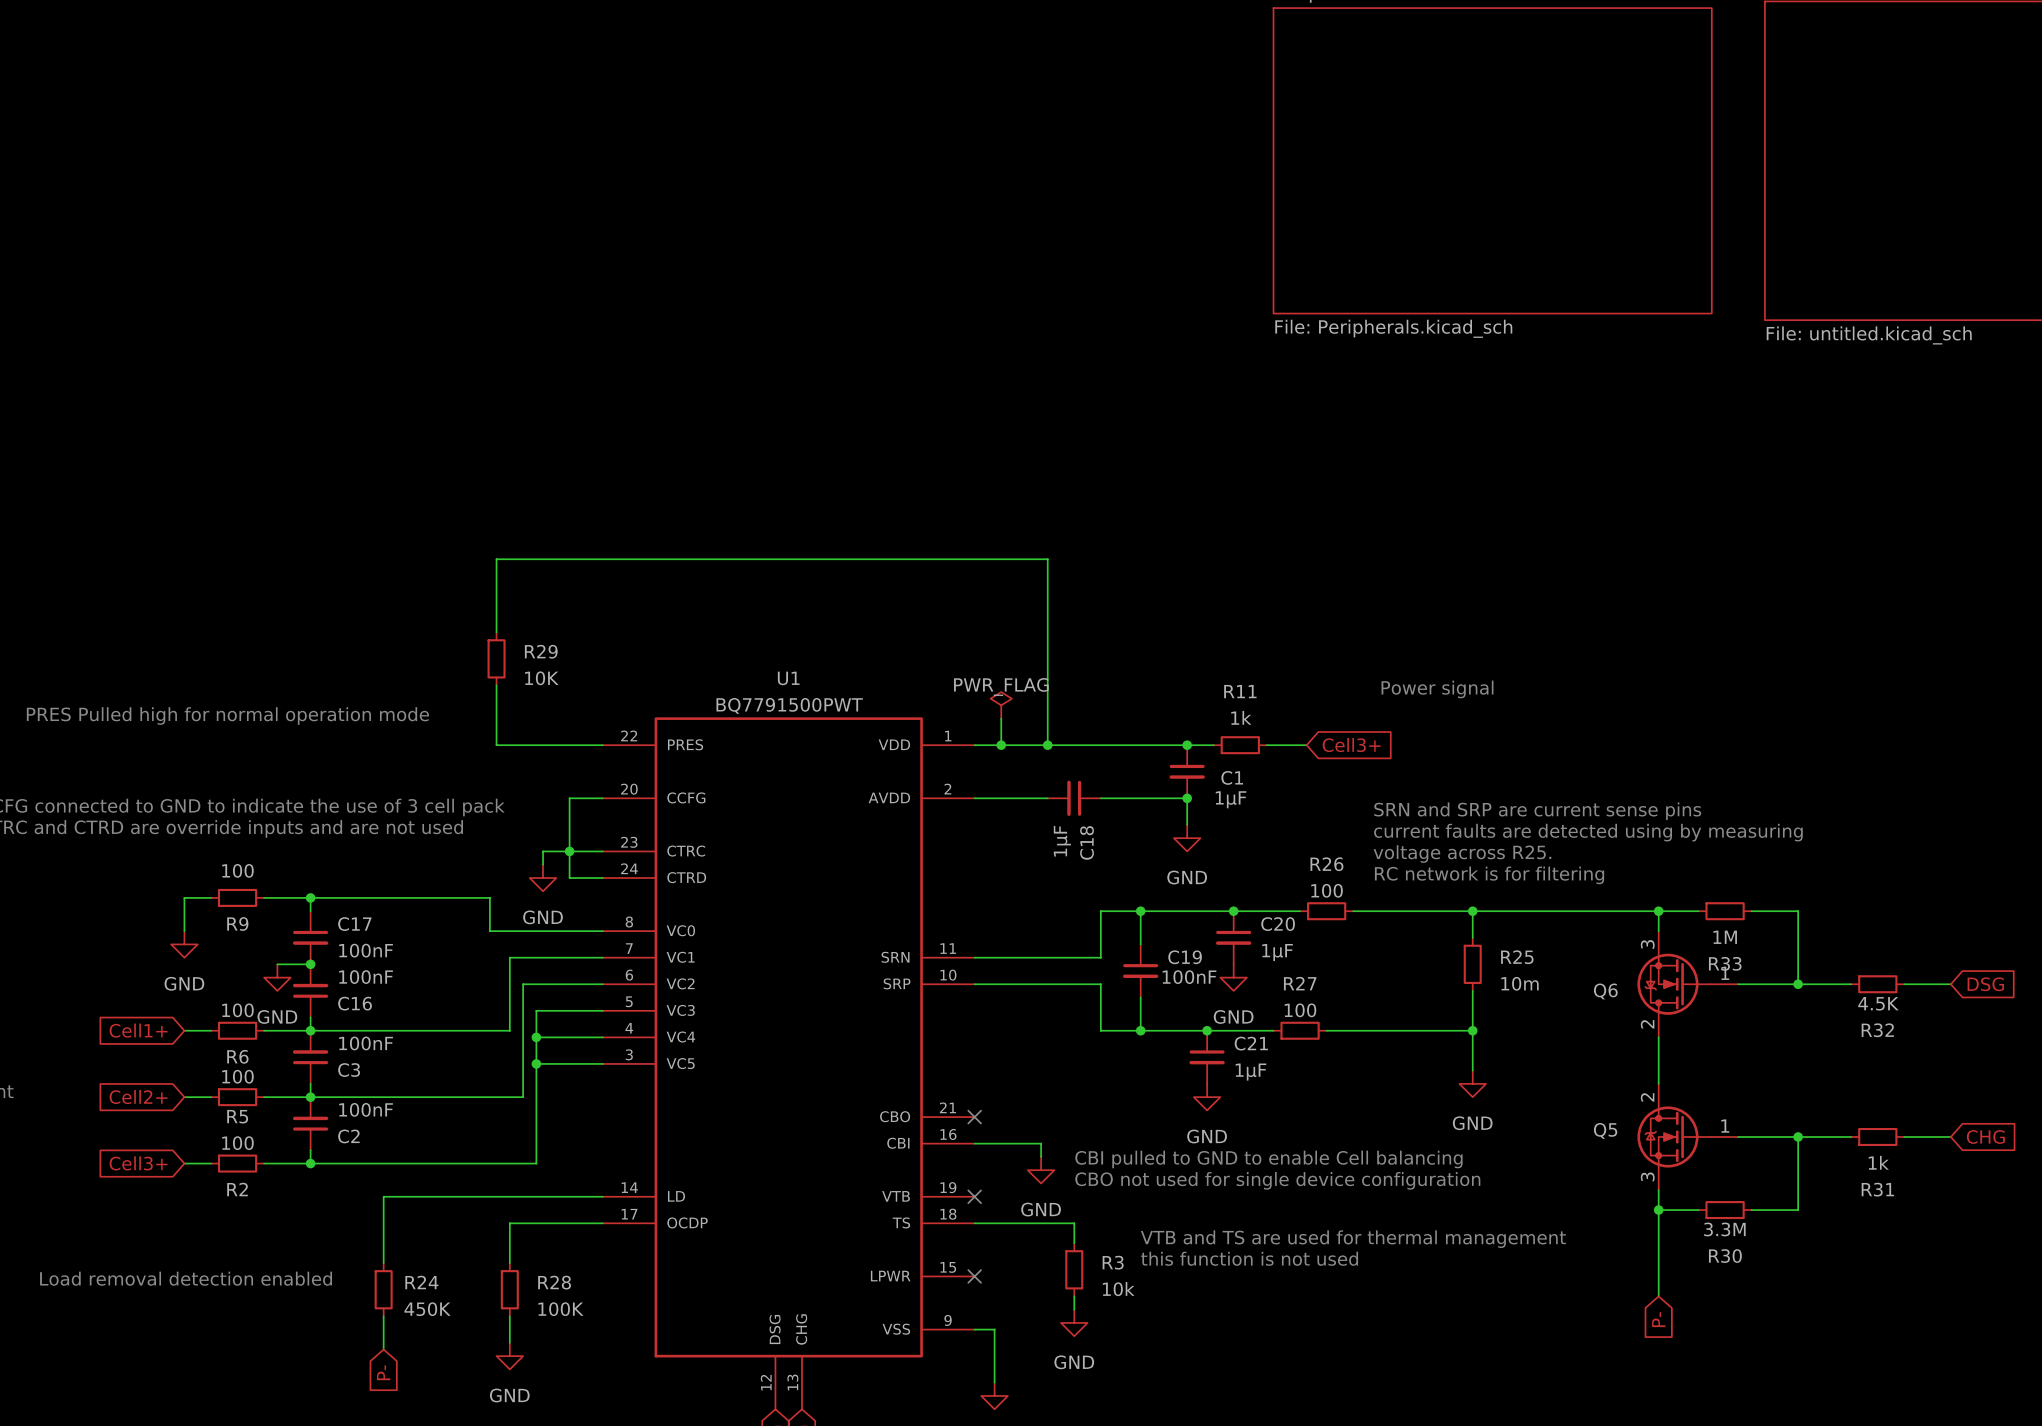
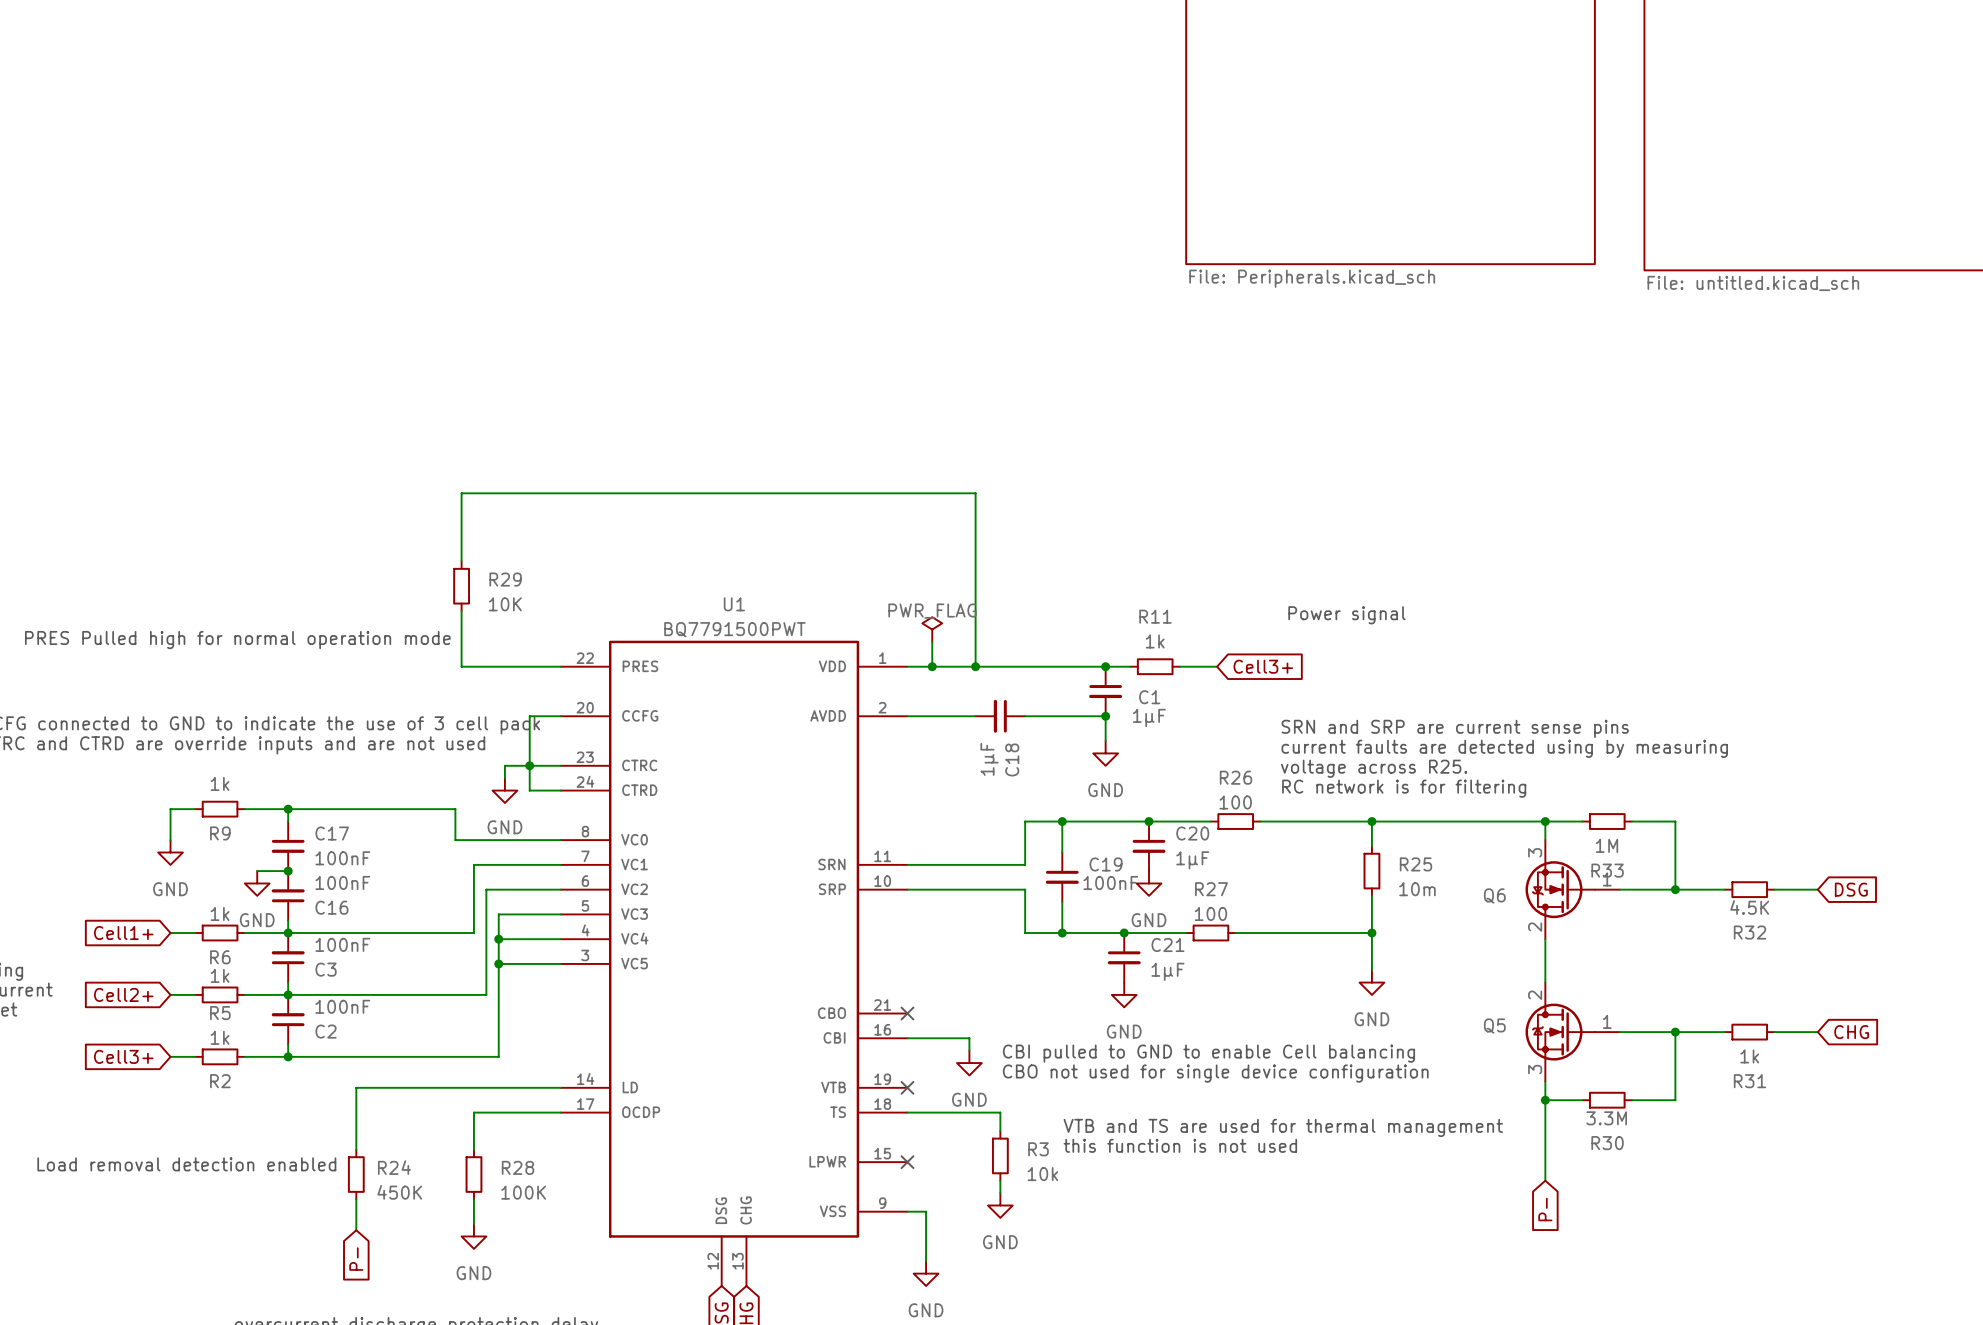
R9 value: 100 (237, 870) -> 1k (220, 783)
R6 value: 100 (237, 1010) -> 1k (220, 913)
R5 value: 100 (237, 1076) -> 1k (220, 975)
R2 value: 100 (237, 1143) -> 1k (220, 1037)

